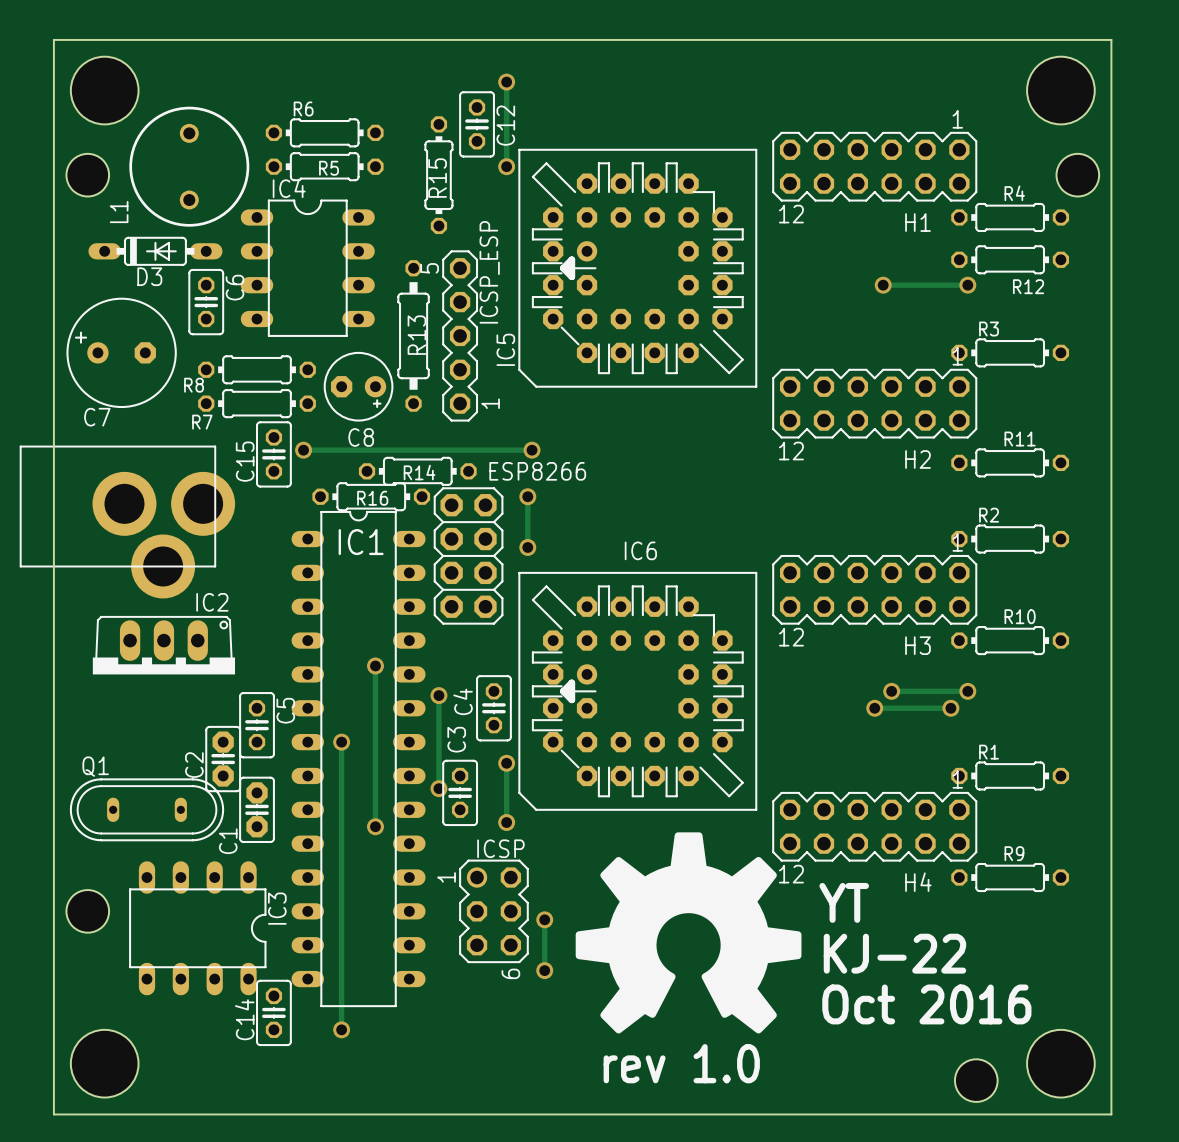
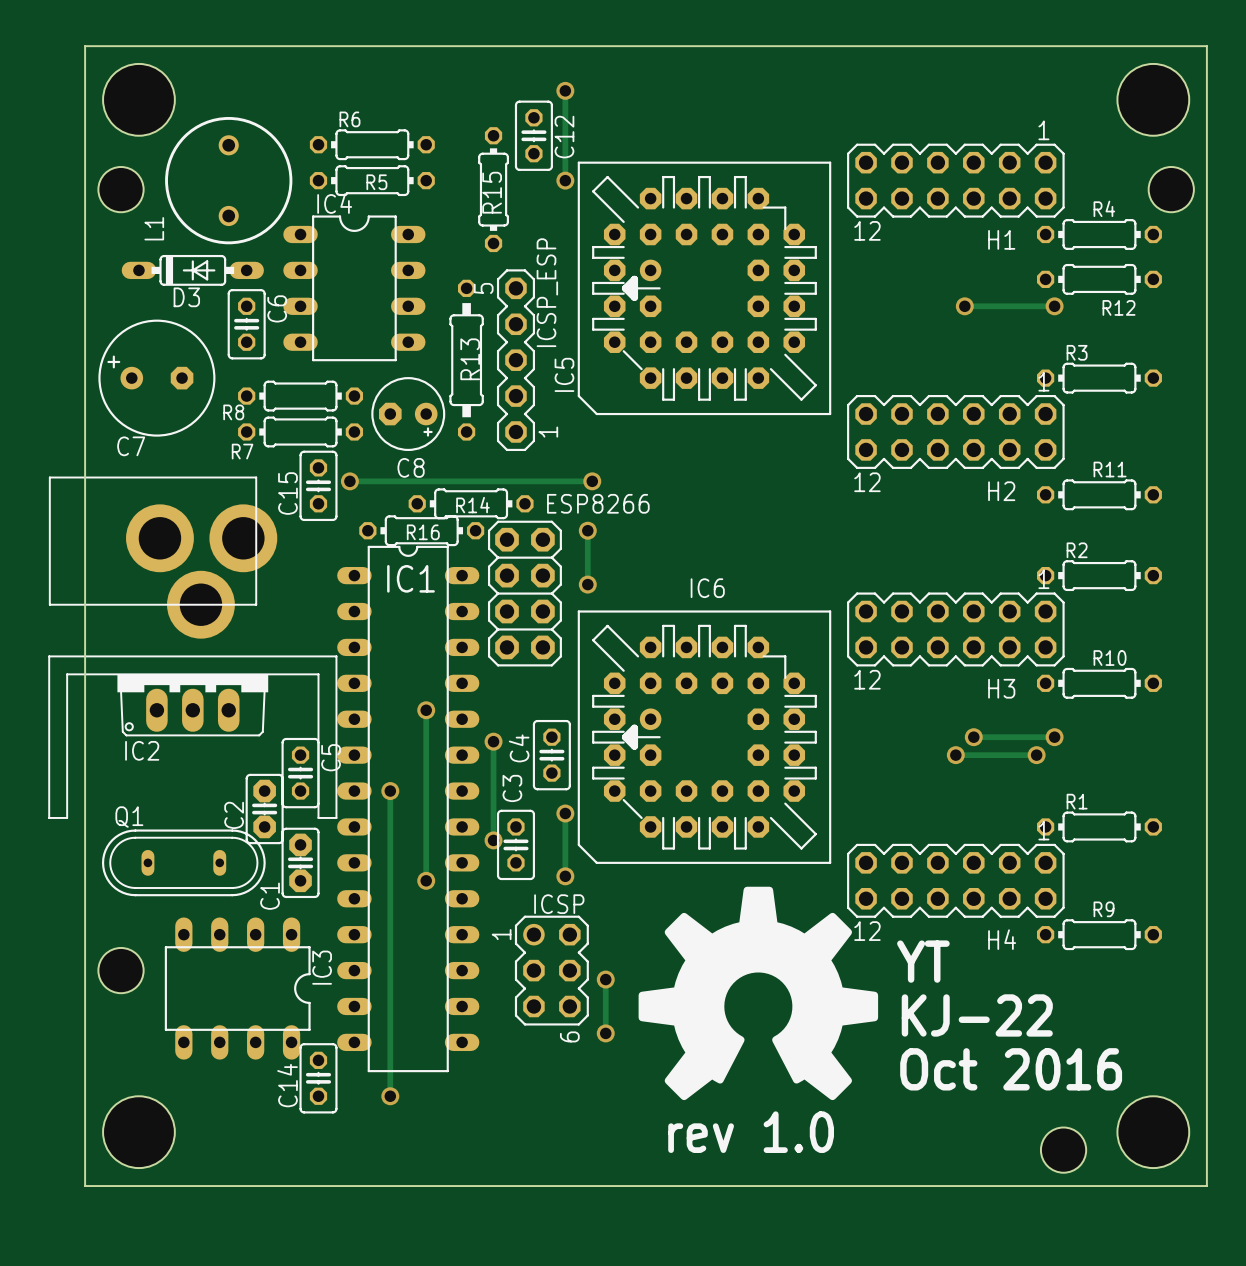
IC2 name position: IC2 (212, 602) -> IC2 (142, 750)
IC2 footprint: [92, 616, 236, 675] -> [48, 655, 338, 819]

